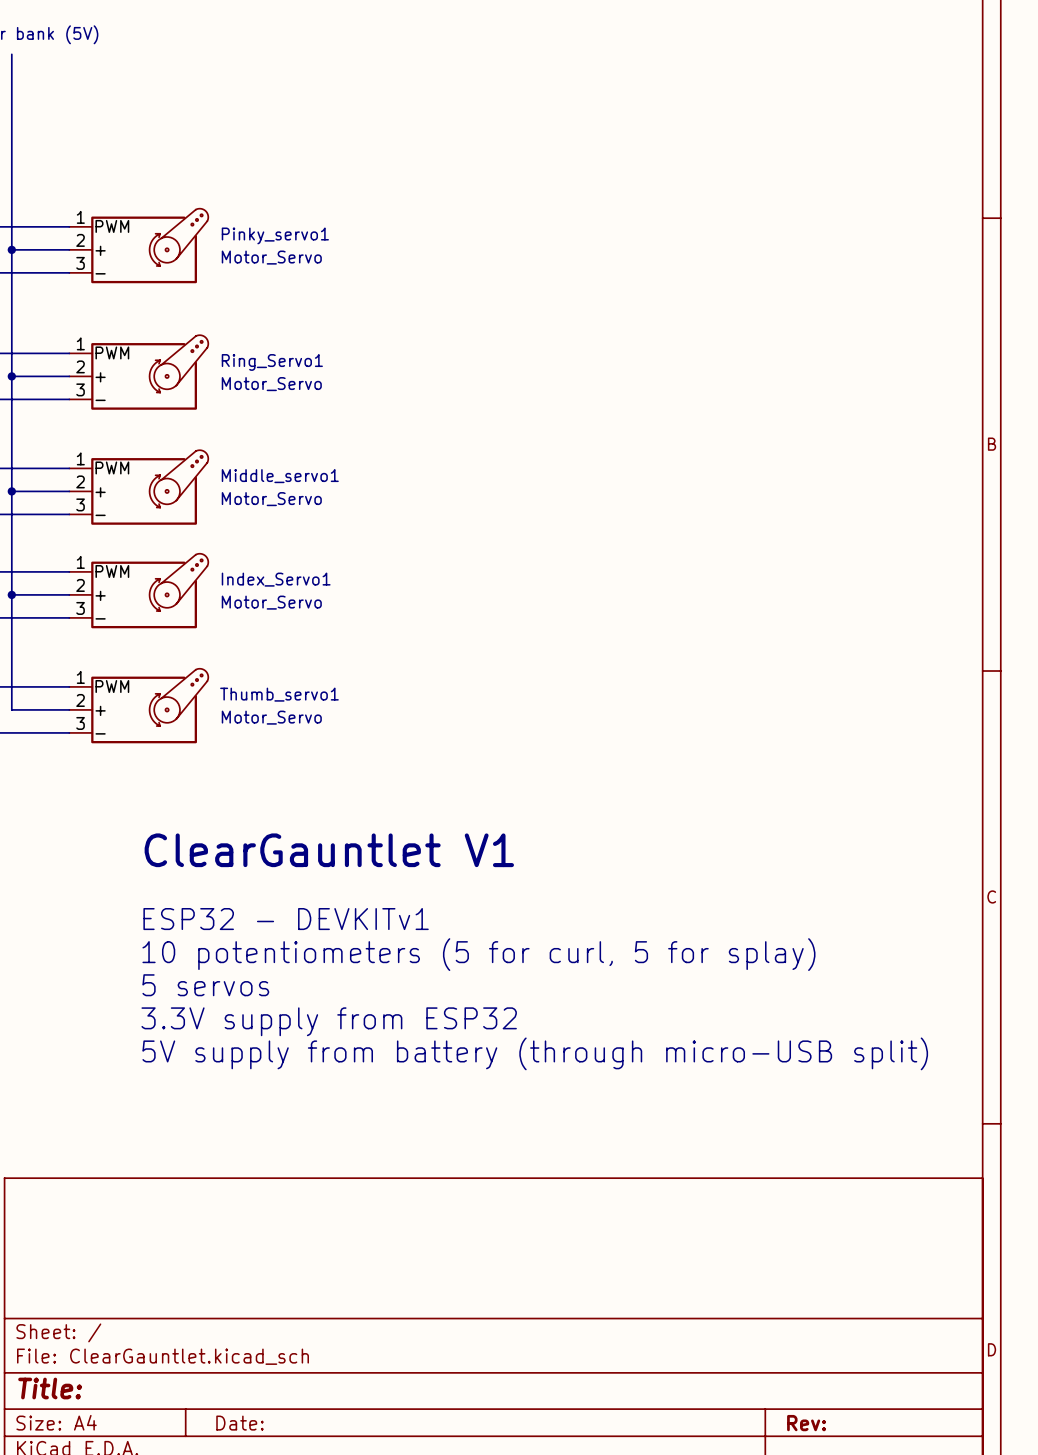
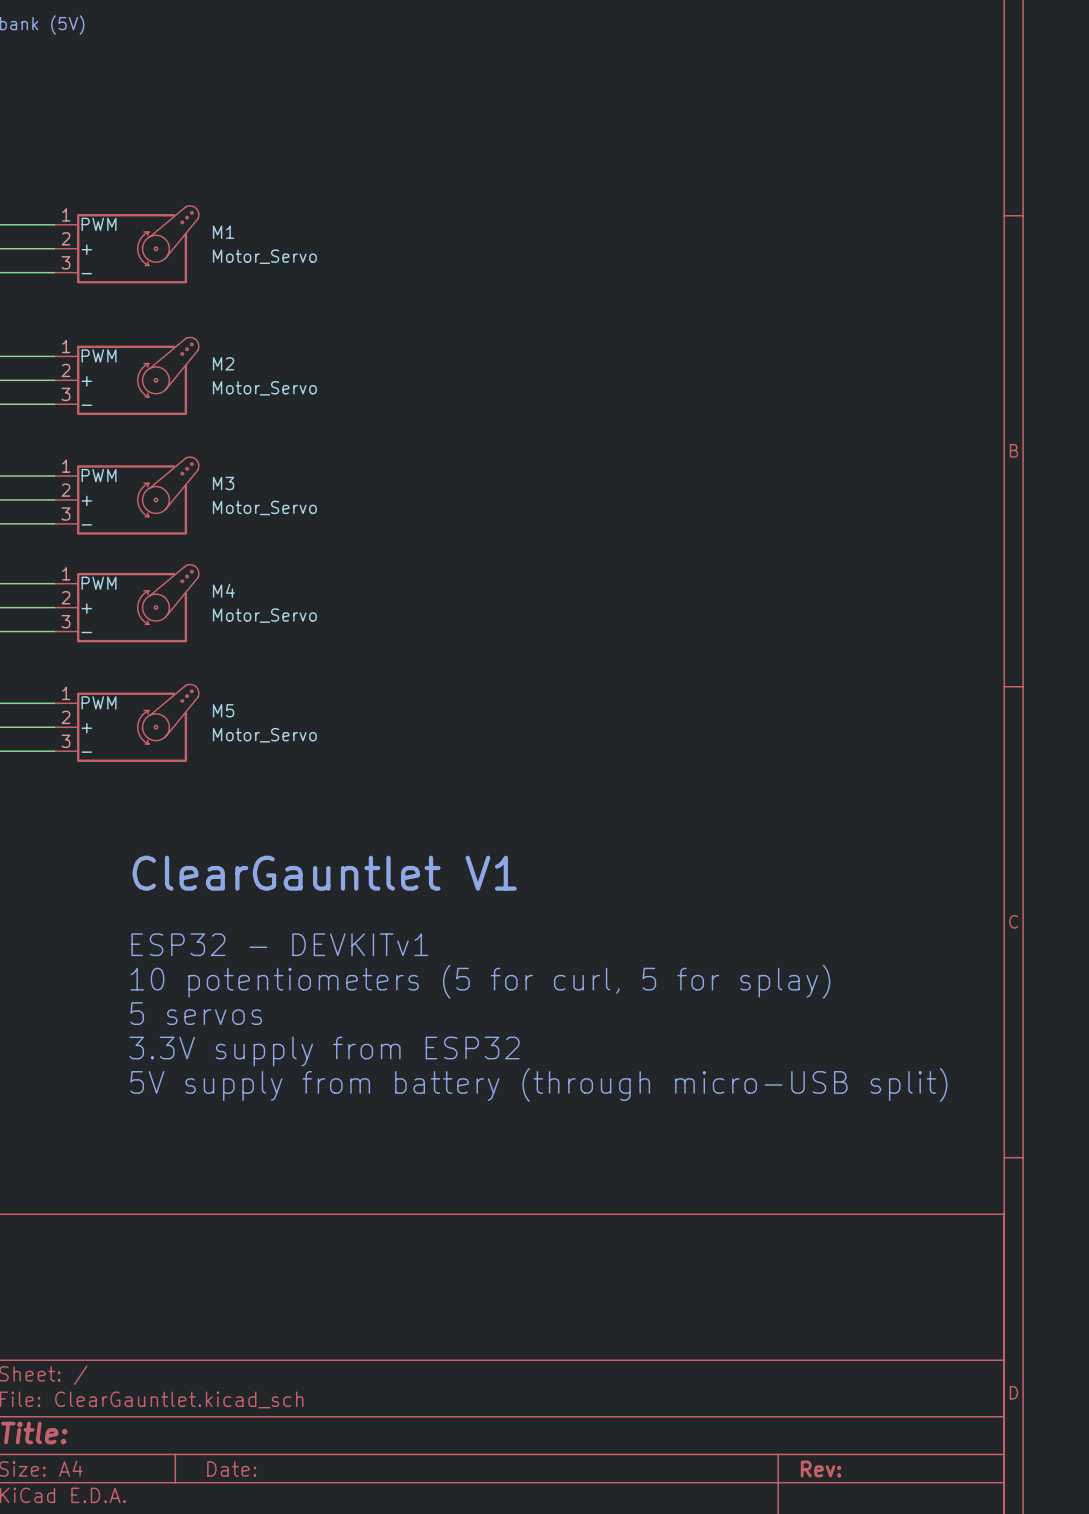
Pinky_servo1 name: Pinky_servo1 (275, 235) -> M1 (223, 232)
Ring_Servo1 name: Ring_Servo1 (272, 362) -> M2 (223, 363)
Middle_servo1 name: Middle_servo1 (280, 476) -> M3 (223, 483)
Index_Servo1 name: Index_Servo1 (276, 579) -> M4 (223, 590)
Thumb_servo1 name: Thumb_servo1 (279, 694) -> M5 (223, 710)

